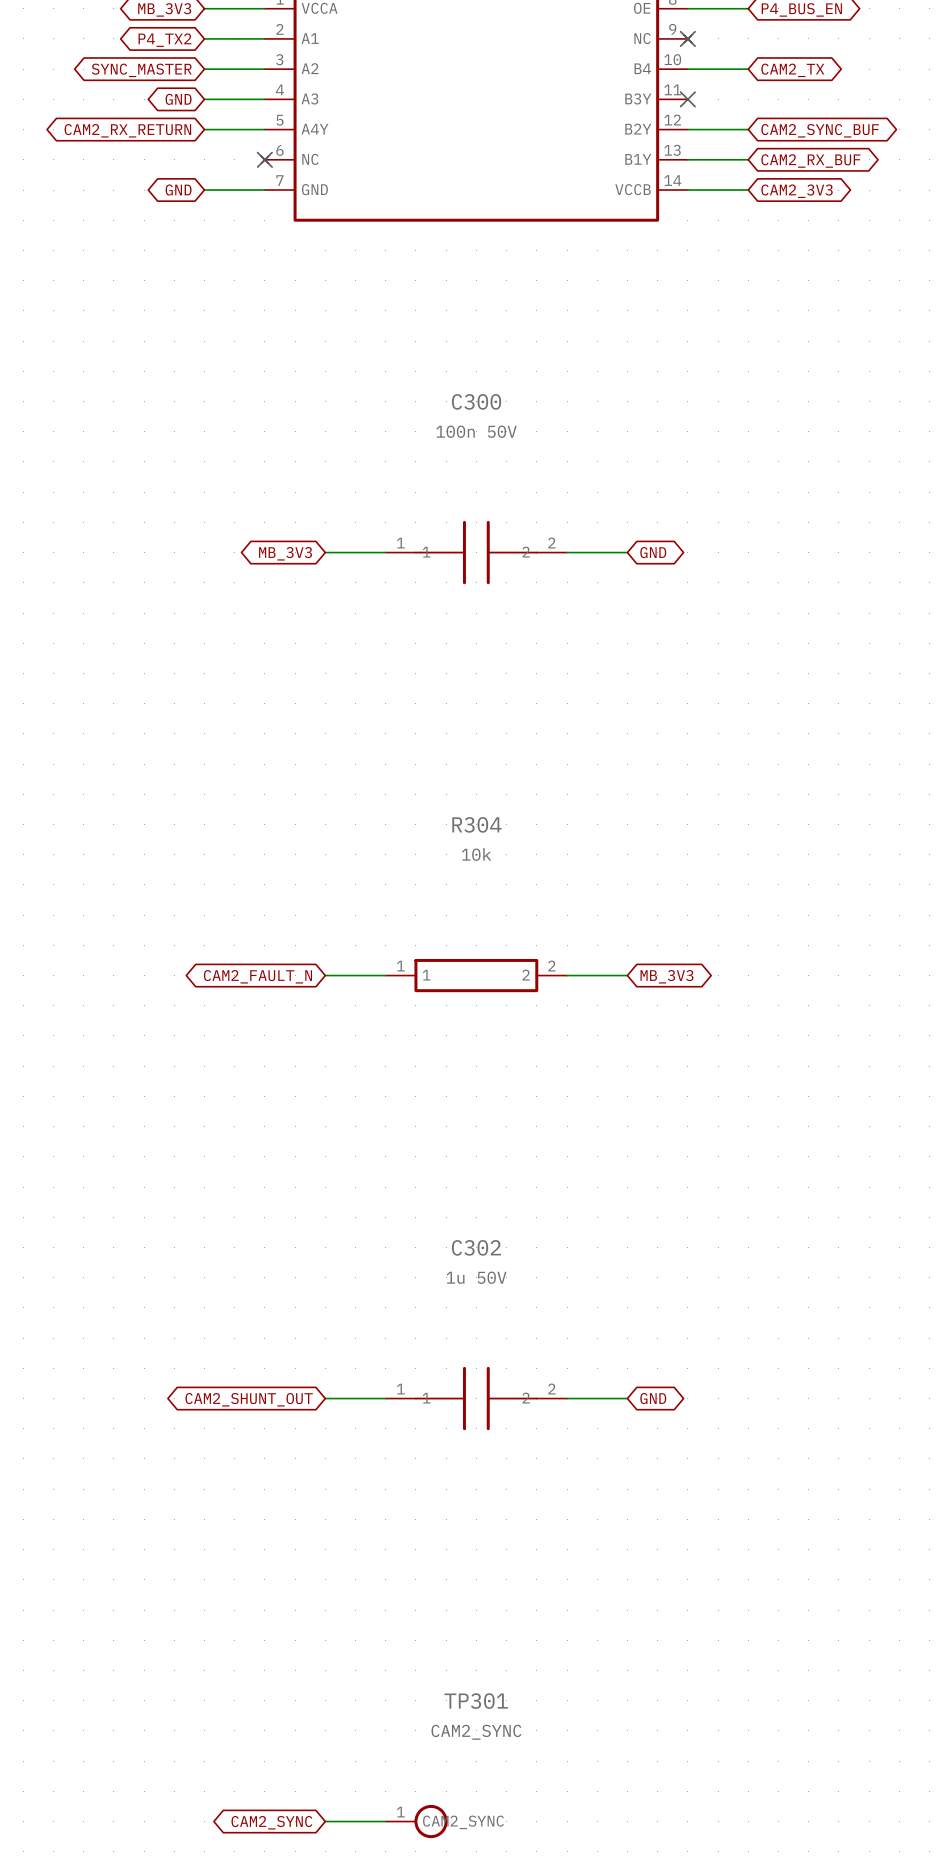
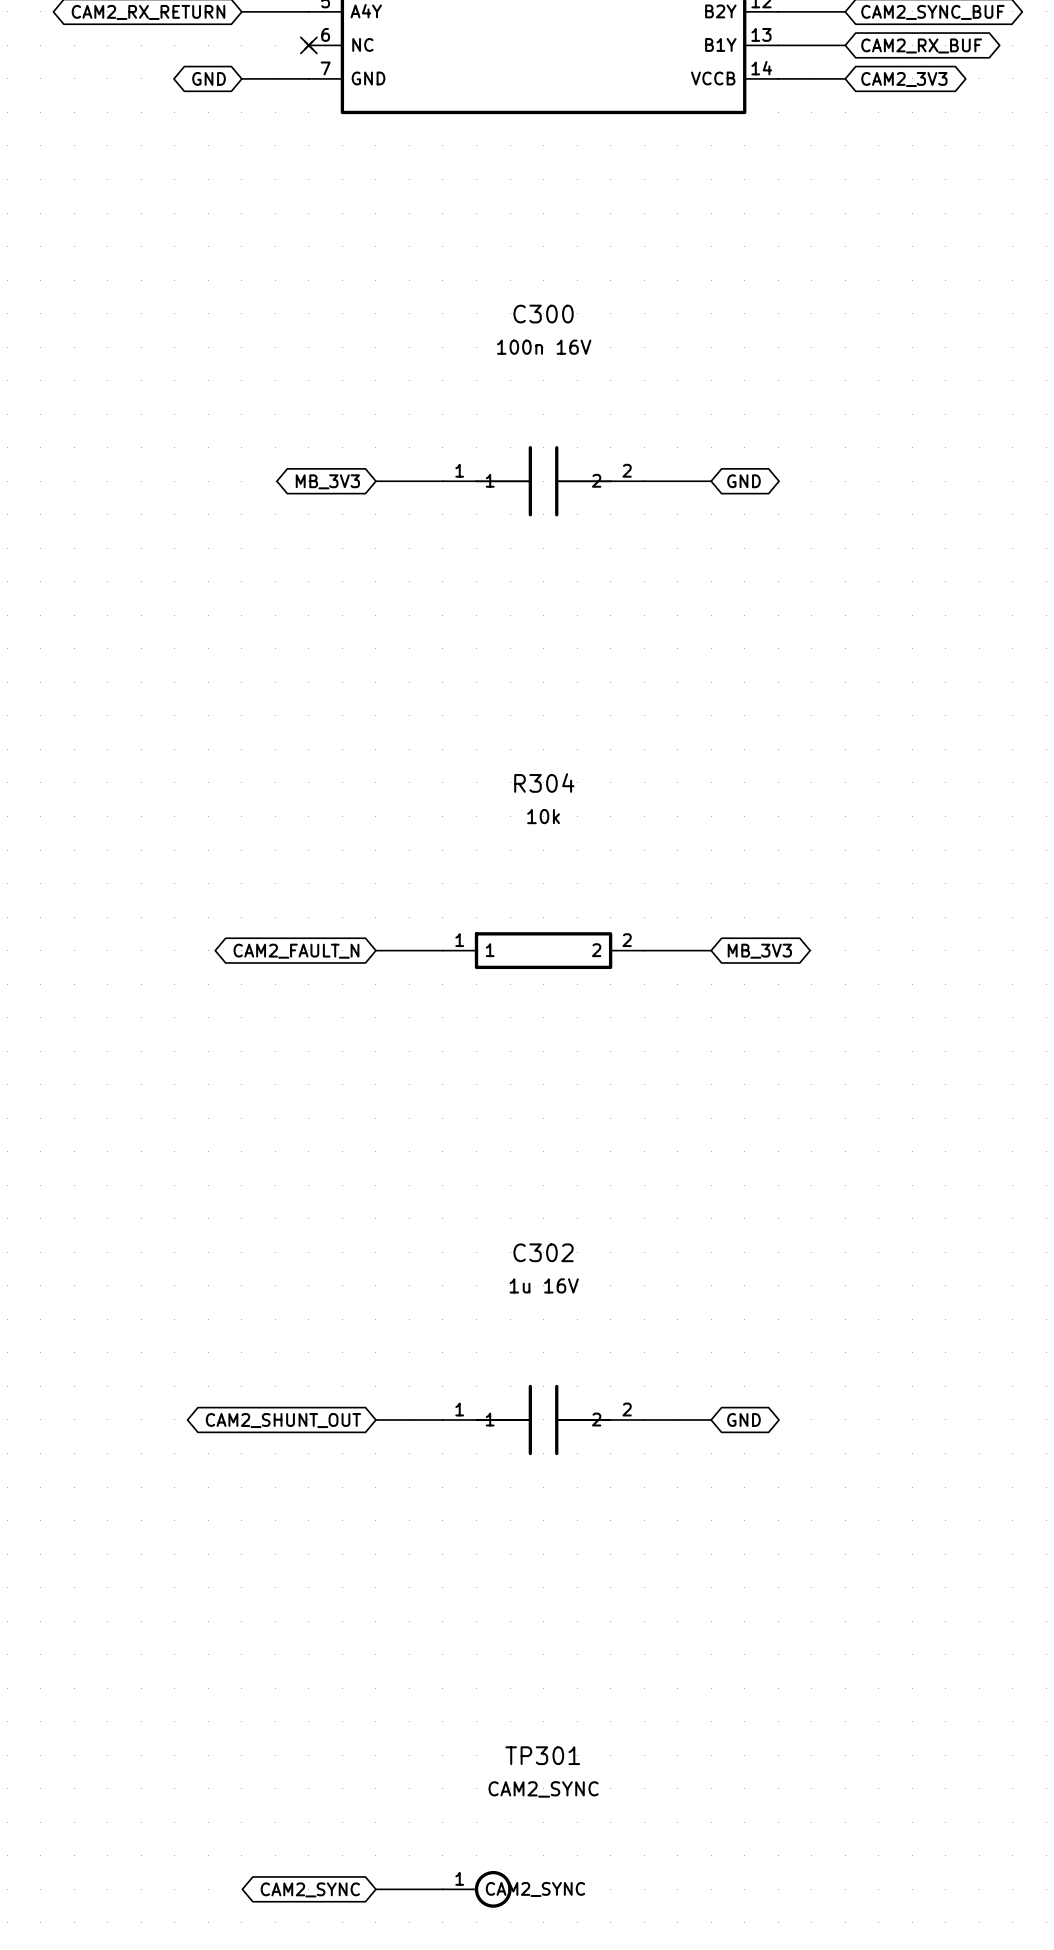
C300 value: 100n 50V (476, 431) -> 100n 16V (544, 347)
C302 value: 1u 50V (476, 1277) -> 1u 16V (544, 1285)

